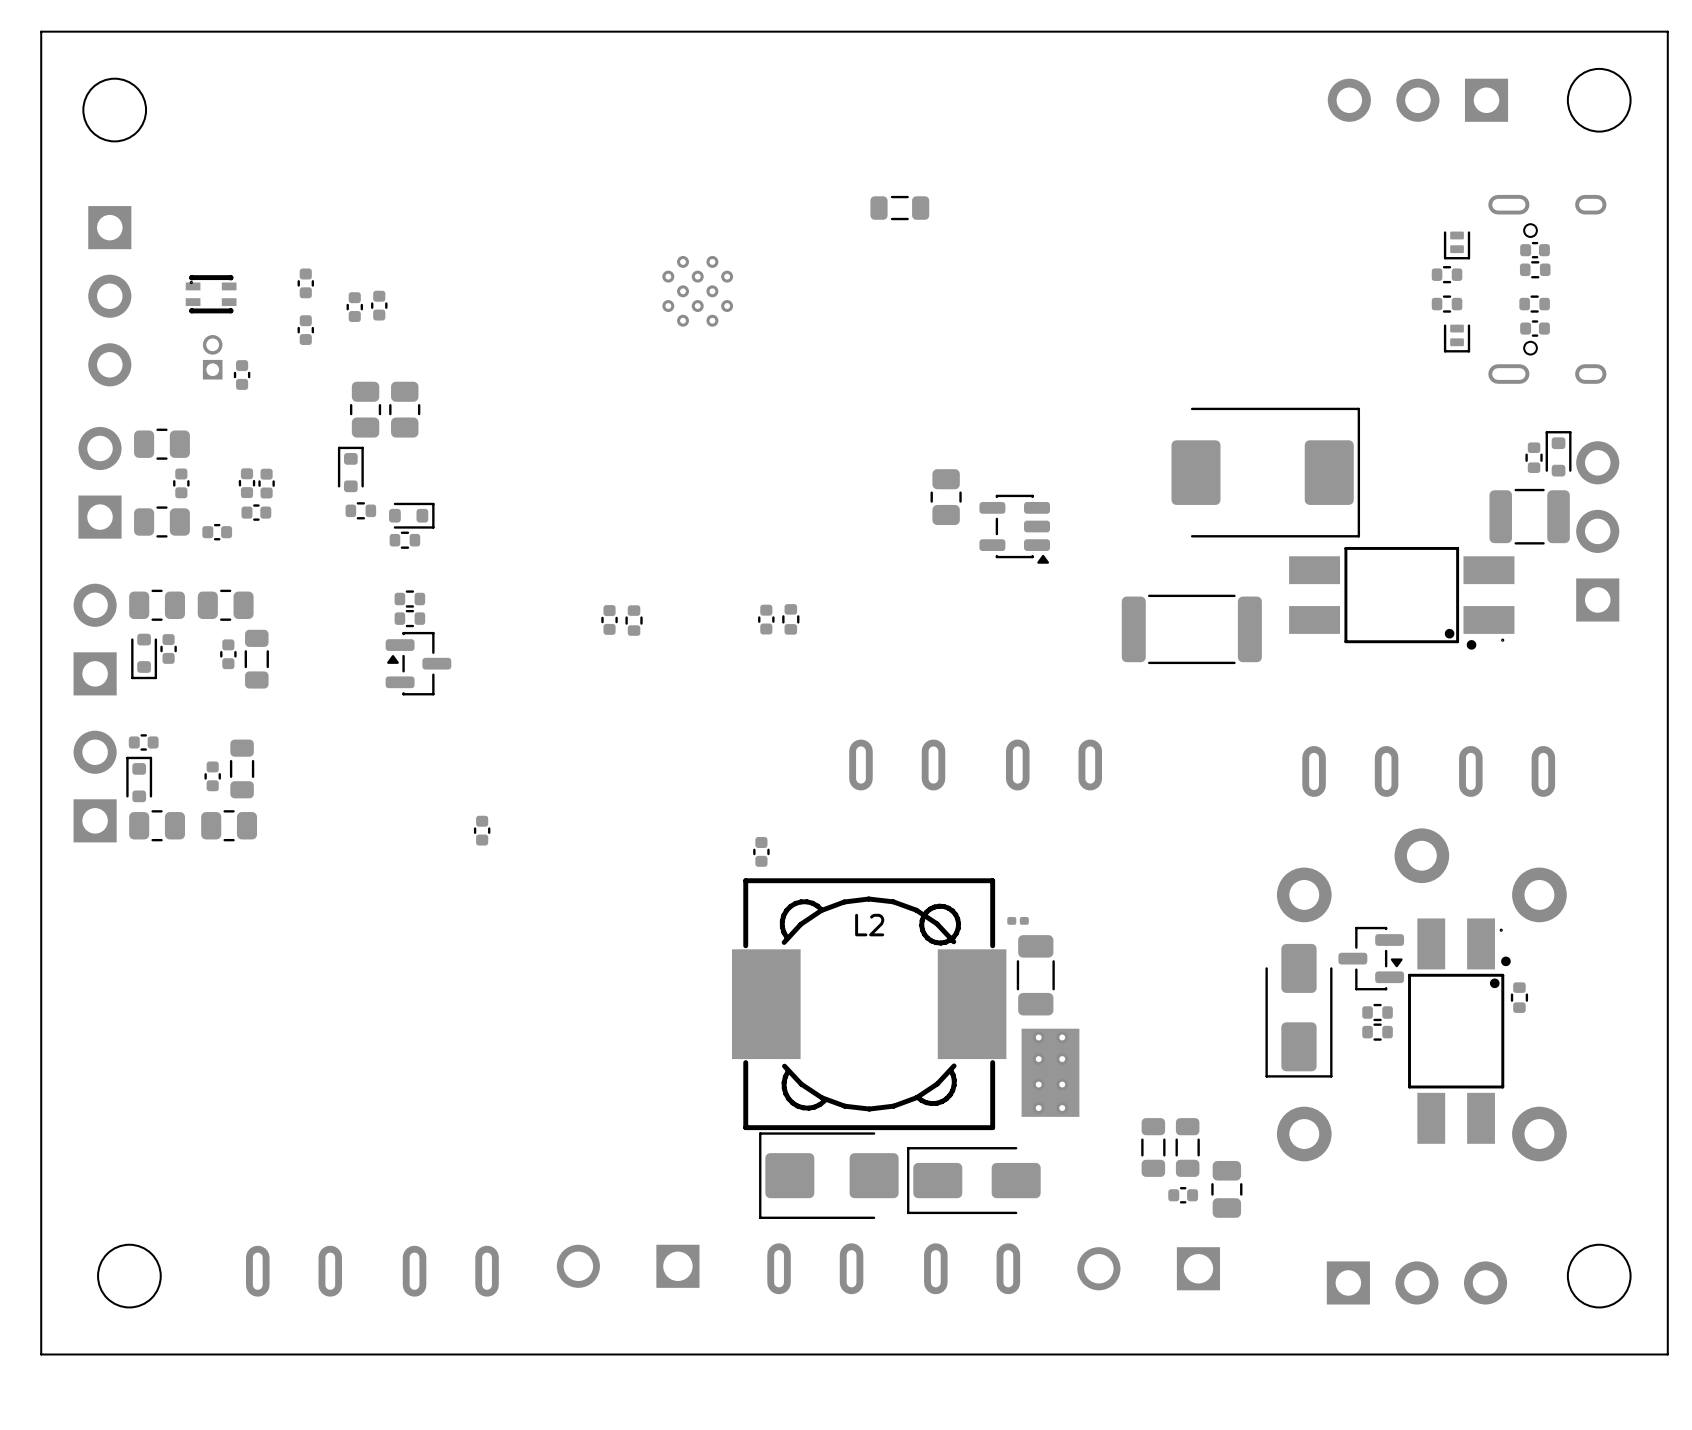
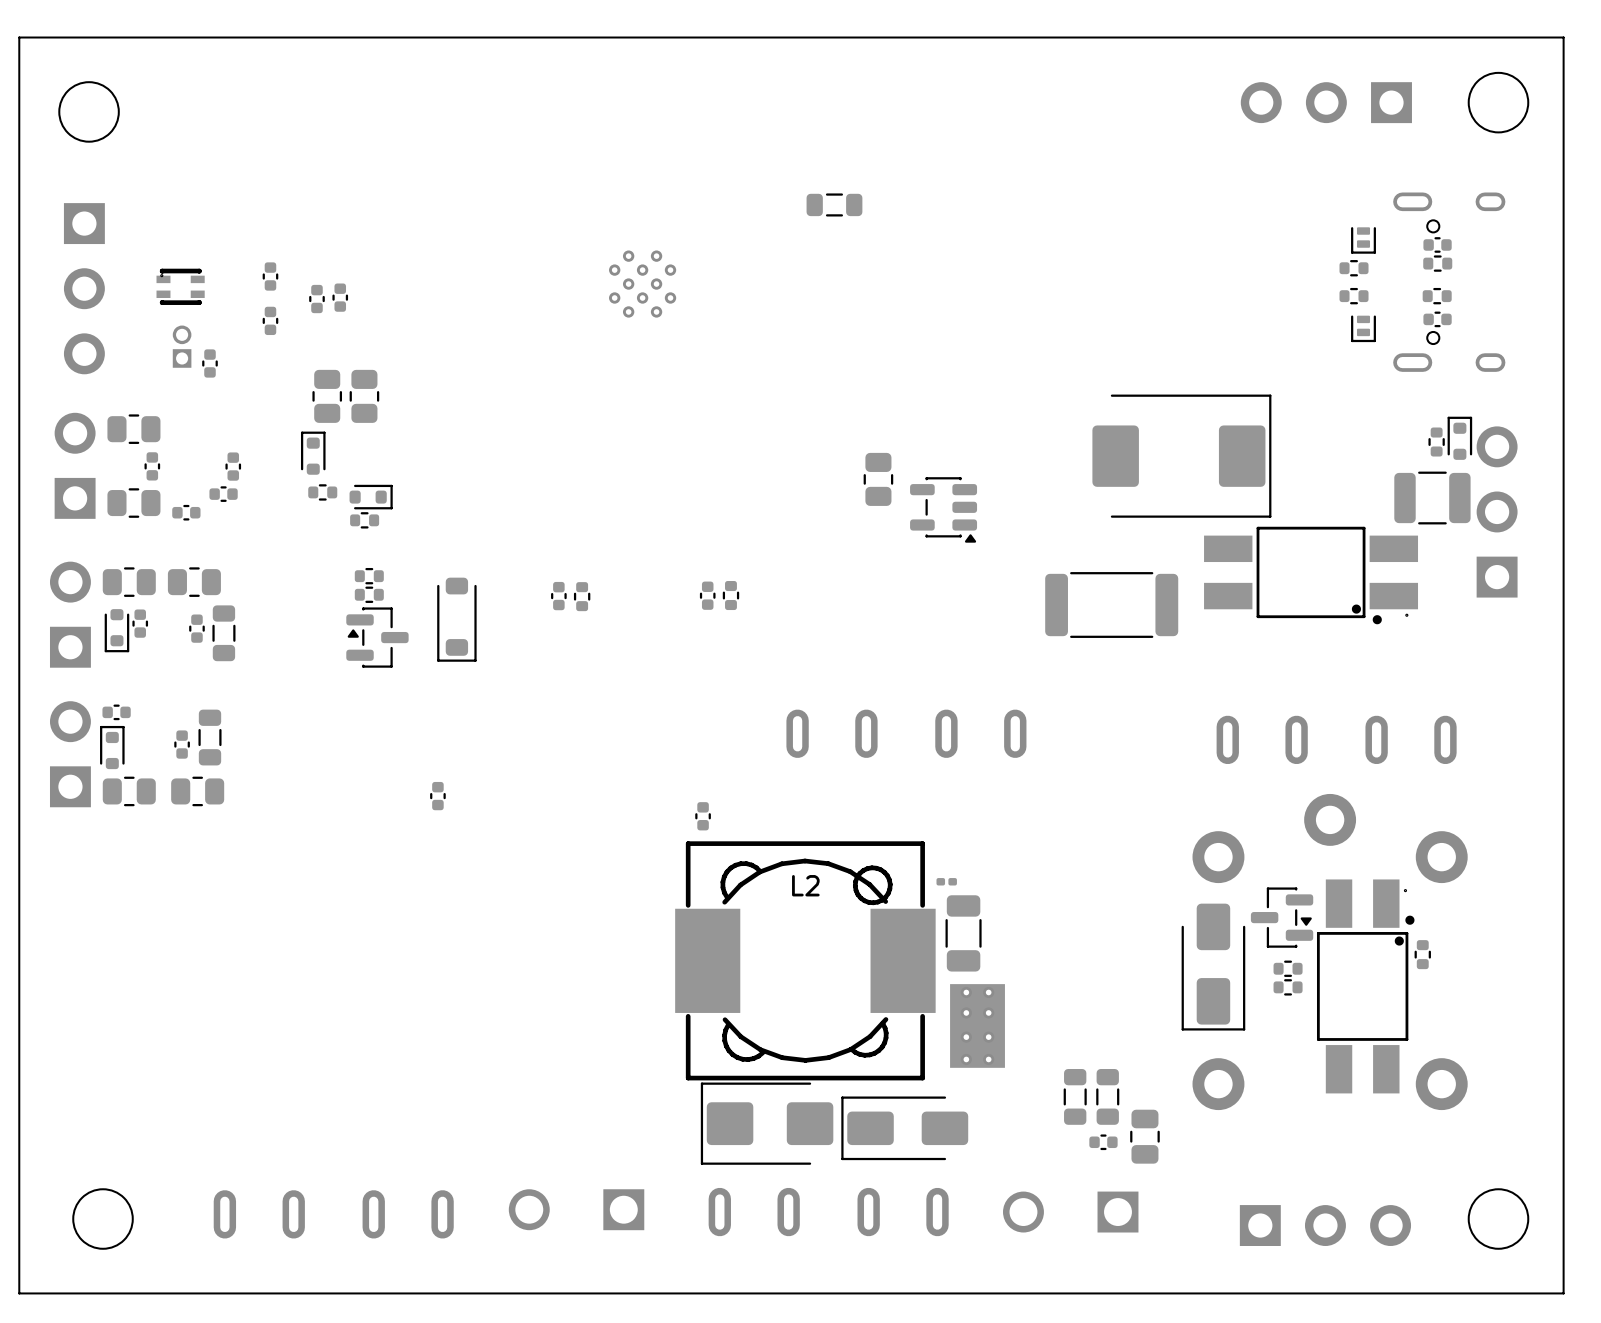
part: (246, 483) -> none
part: none -> (456, 619)

